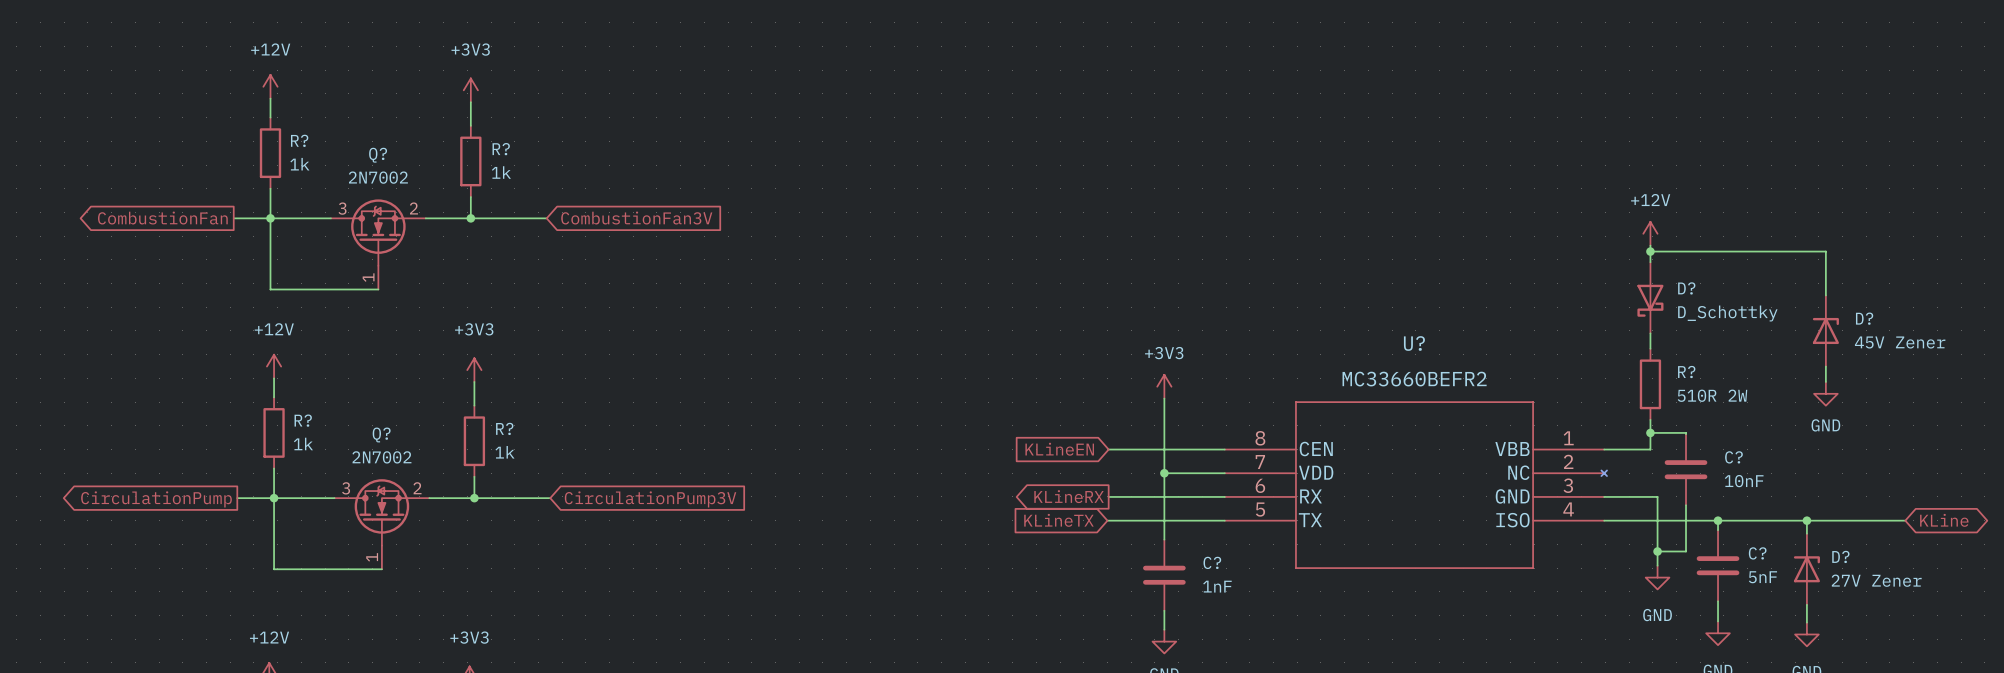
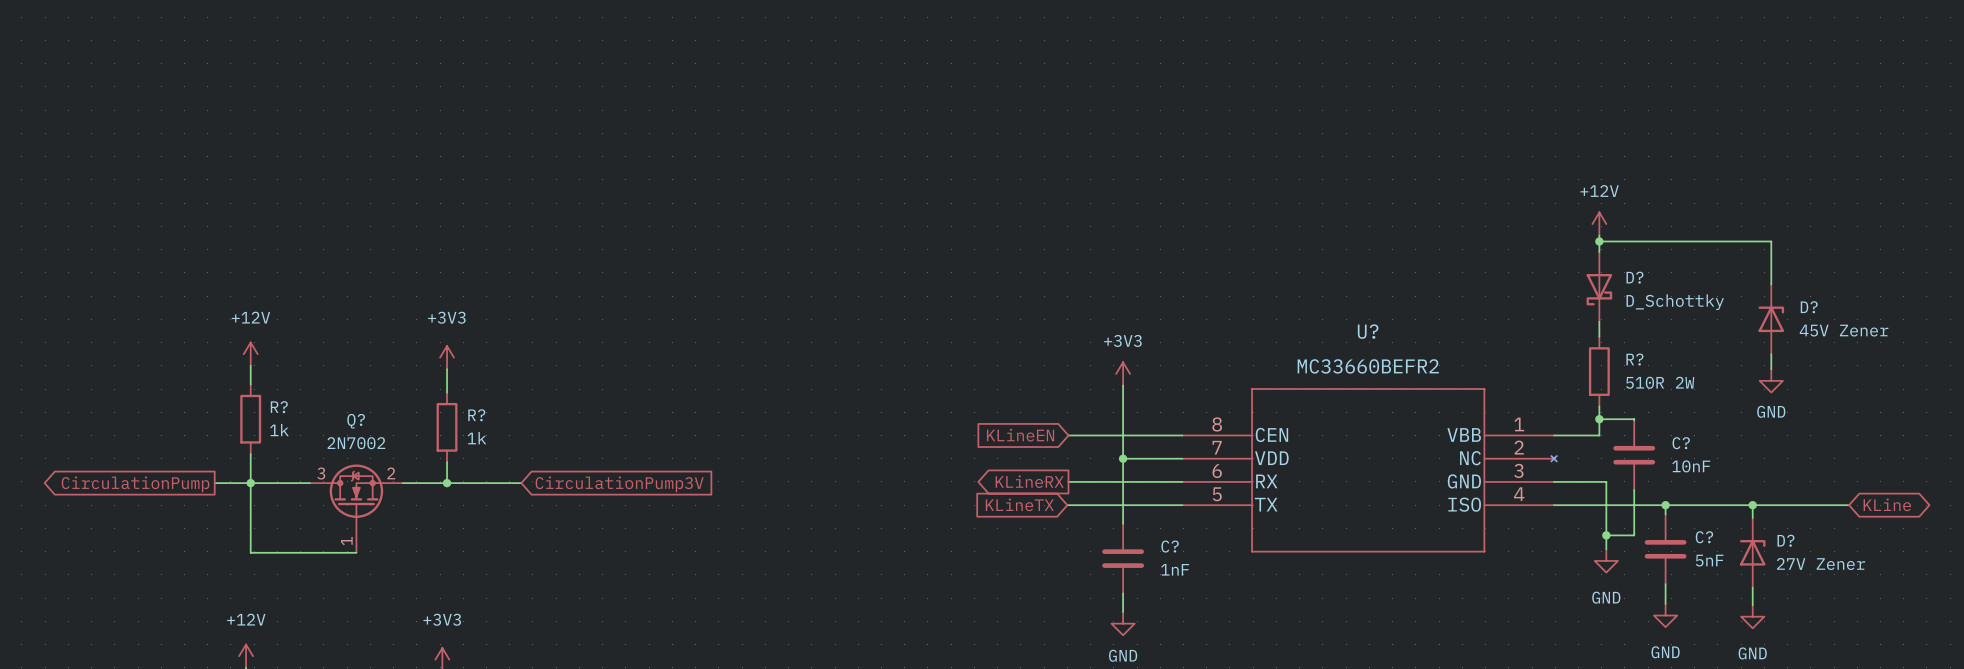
power symbol: +12V (270, 86) -> none
power symbol: +3V3 (470, 90) -> none
wire: (270, 98) (270, 117) -> none
wire: (470, 102) (470, 125) -> none
R?: 1k (270, 153) -> none
R?: 1k (470, 161) -> none
wire: (270, 188) (270, 289) (378, 289) -> none
wire: (470, 197) (470, 218) -> none
global label: CombustionFan (162, 218) -> none
wire: (233, 218) (330, 218) -> none
junction: (270, 218) -> none
wire: (425, 218) (546, 218) -> none
junction: (470, 218) -> none
global label: CombustionFan3V (636, 218) -> none
Q?: 2N7002 (378, 244) -> none

